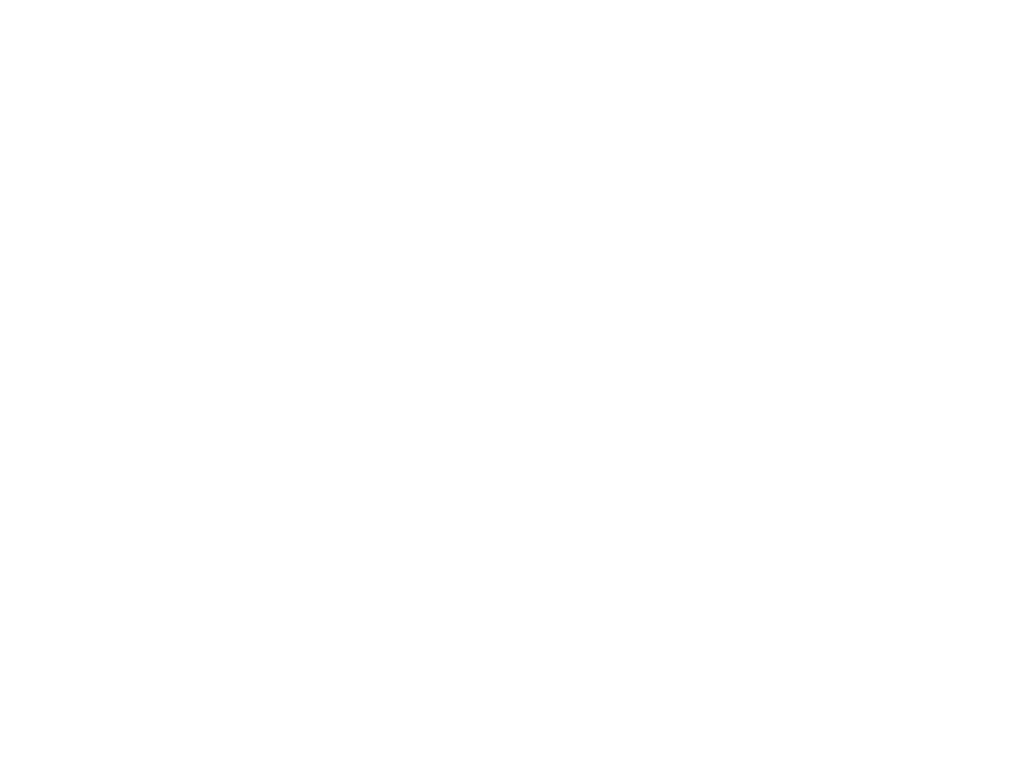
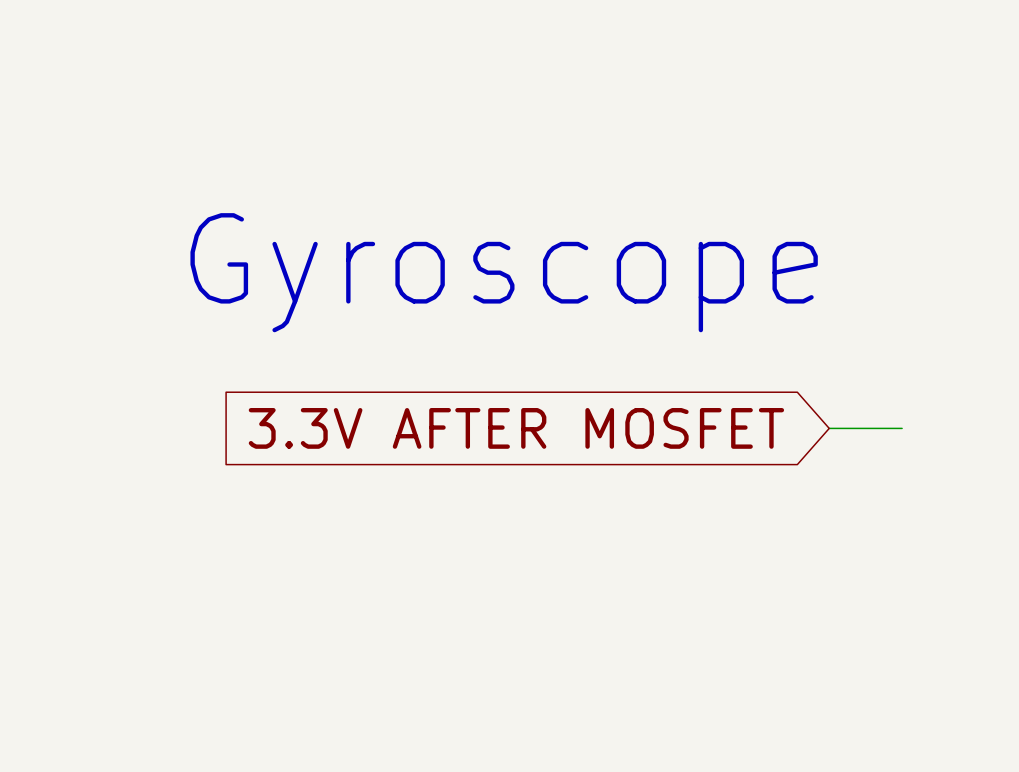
text: none -> Gyroscope (504, 272)
global label: none -> 3.3V AFTER MOSFET (516, 428)
wire: none -> (829, 428) (902, 428)

